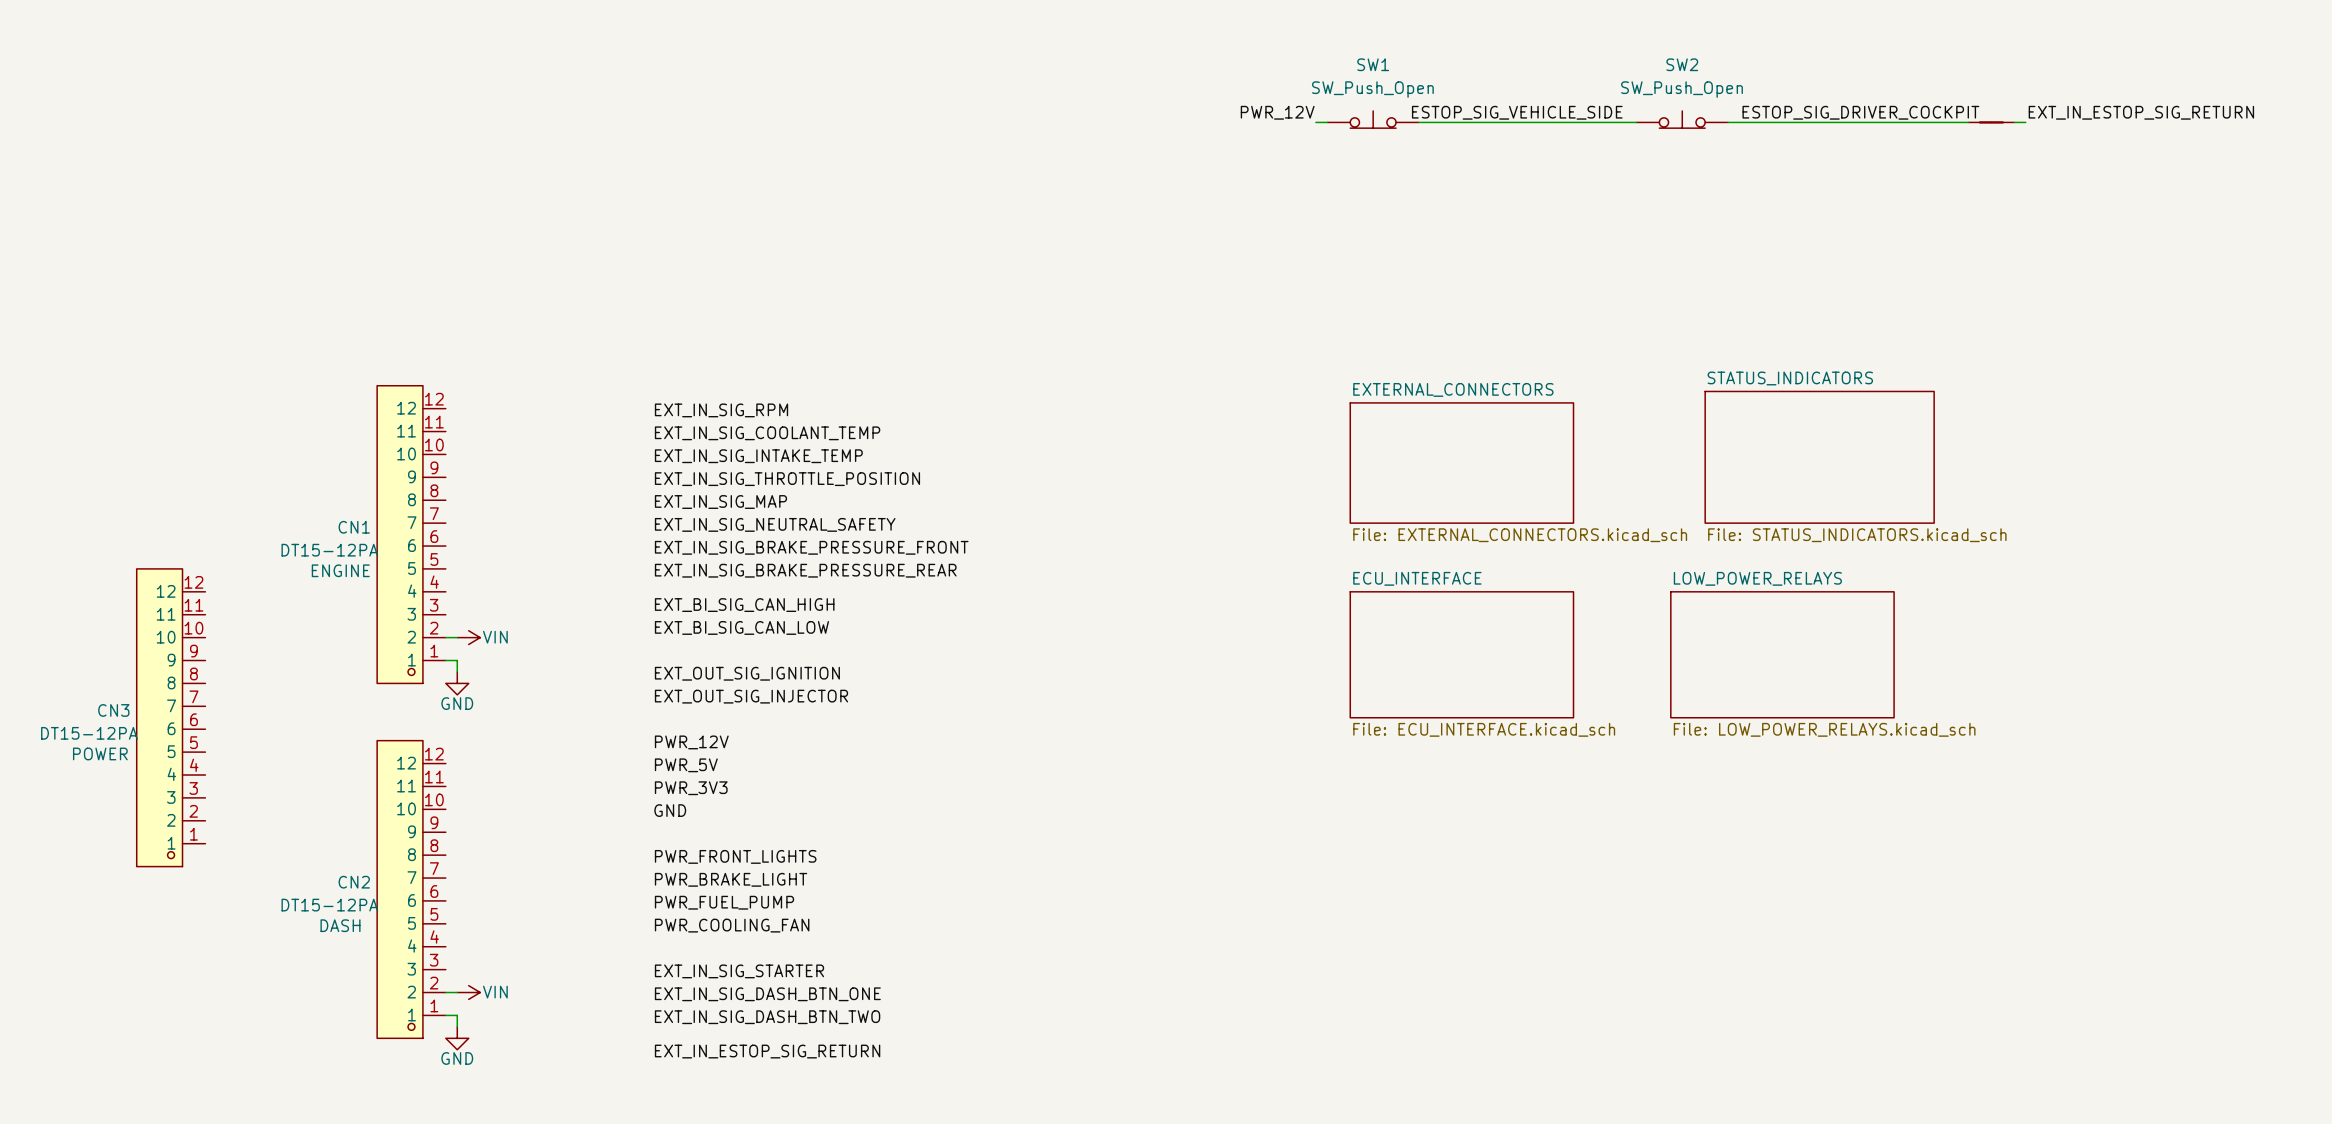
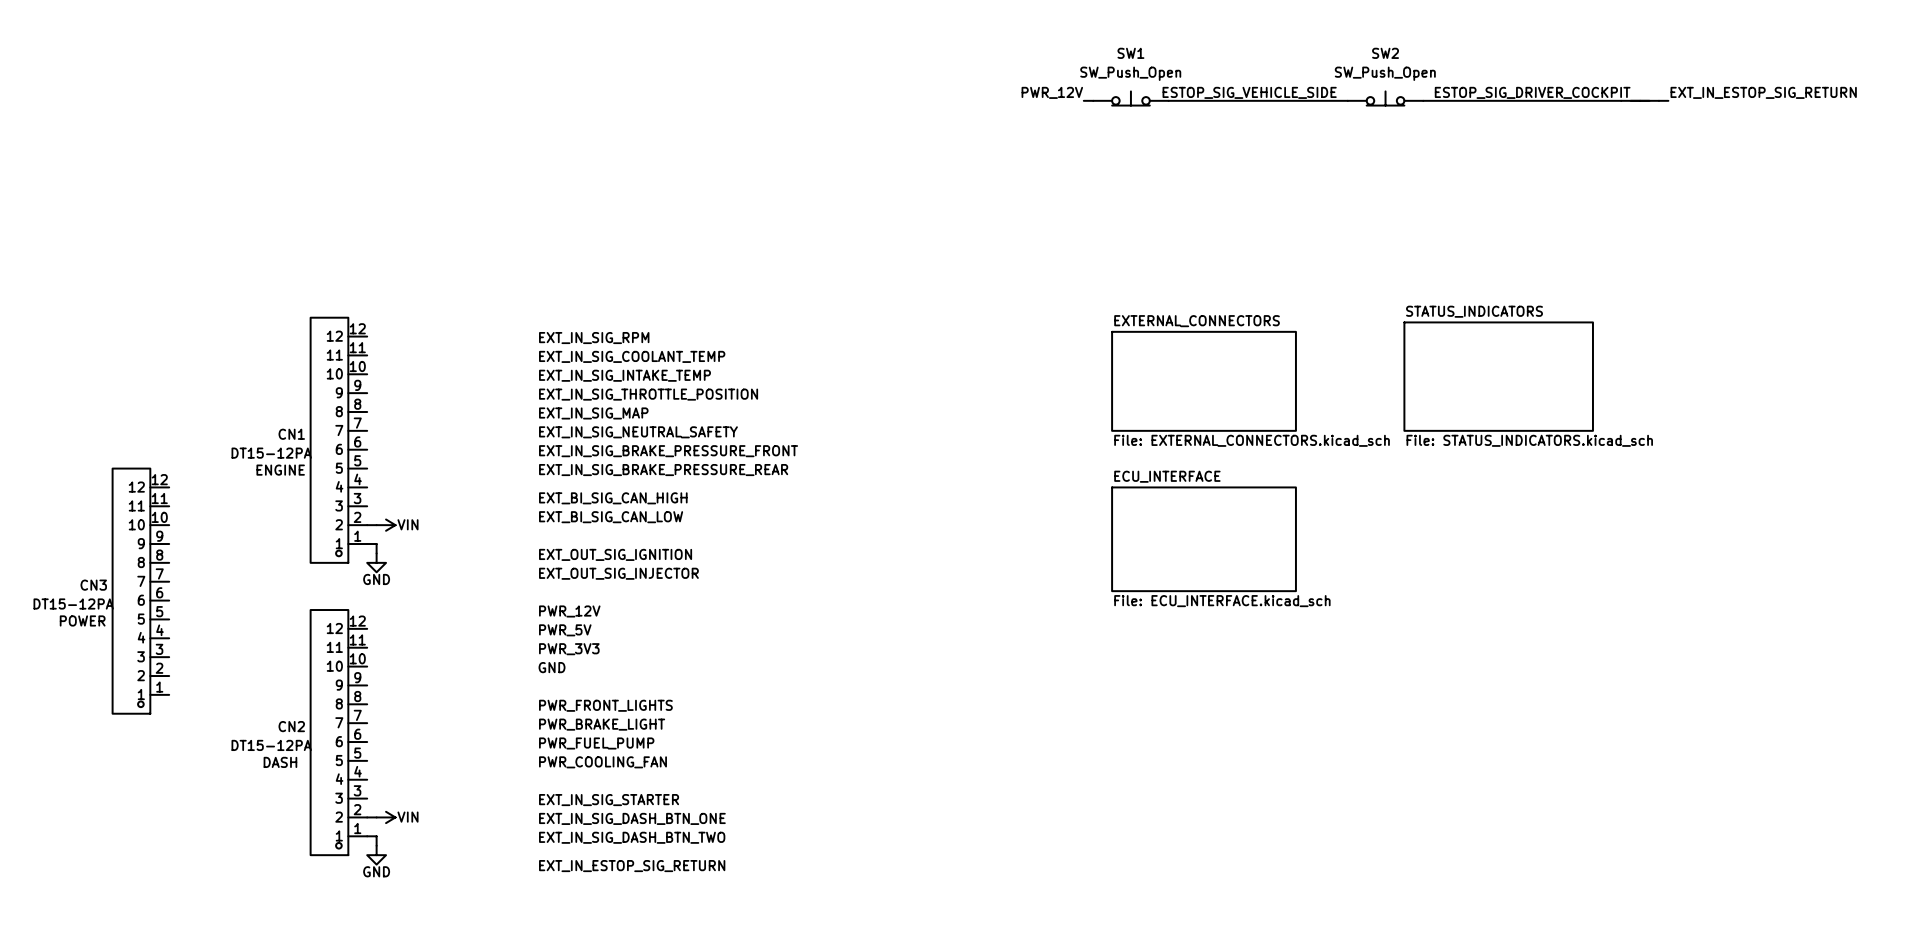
sheet LOW_POWER_RELAYS: File: LOW_POWER_RELAYS.kicad_sch (1782, 654) -> none

